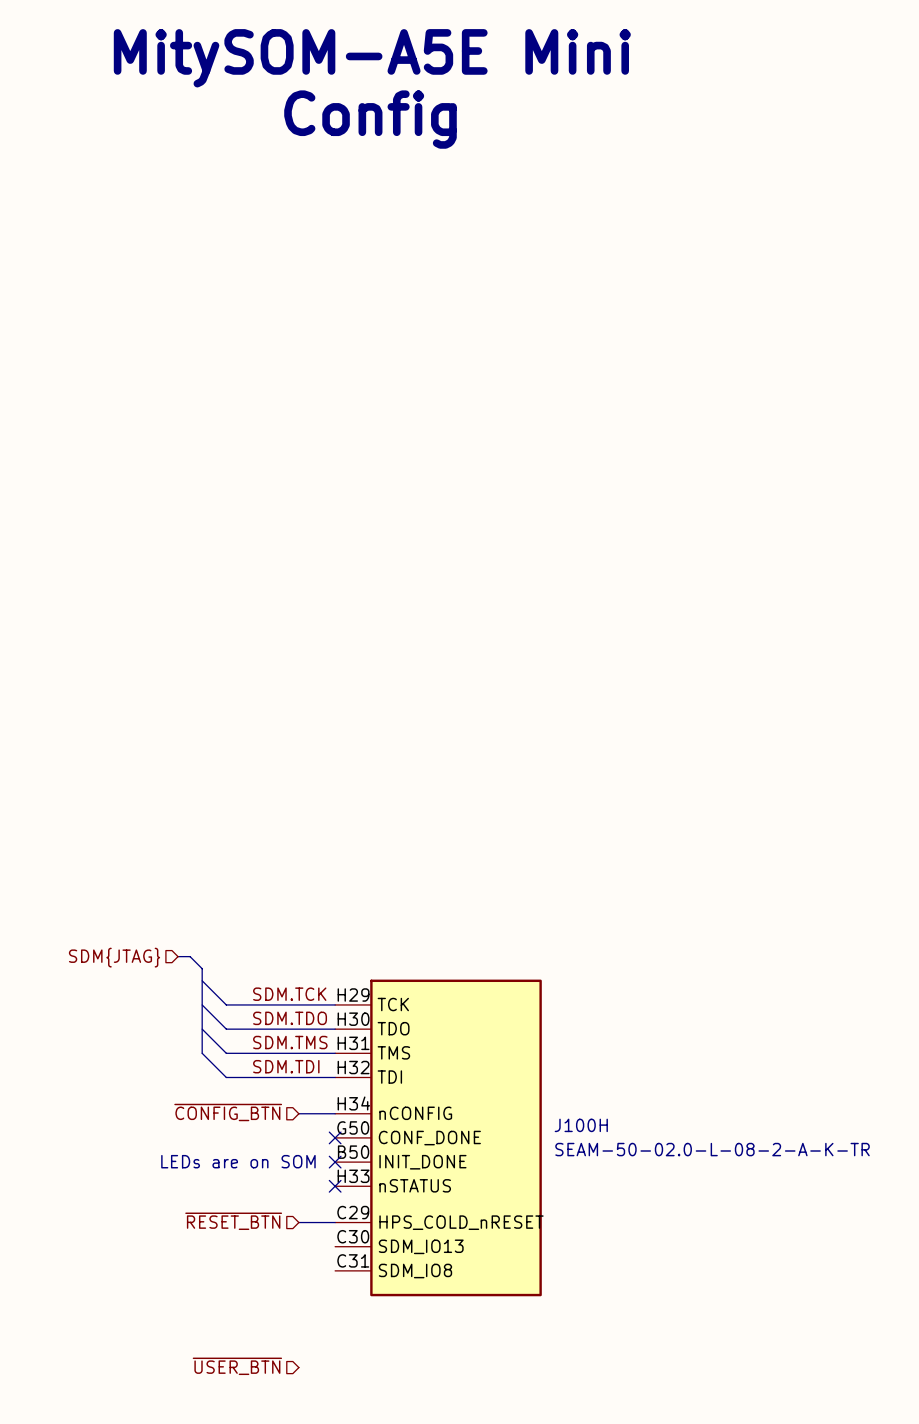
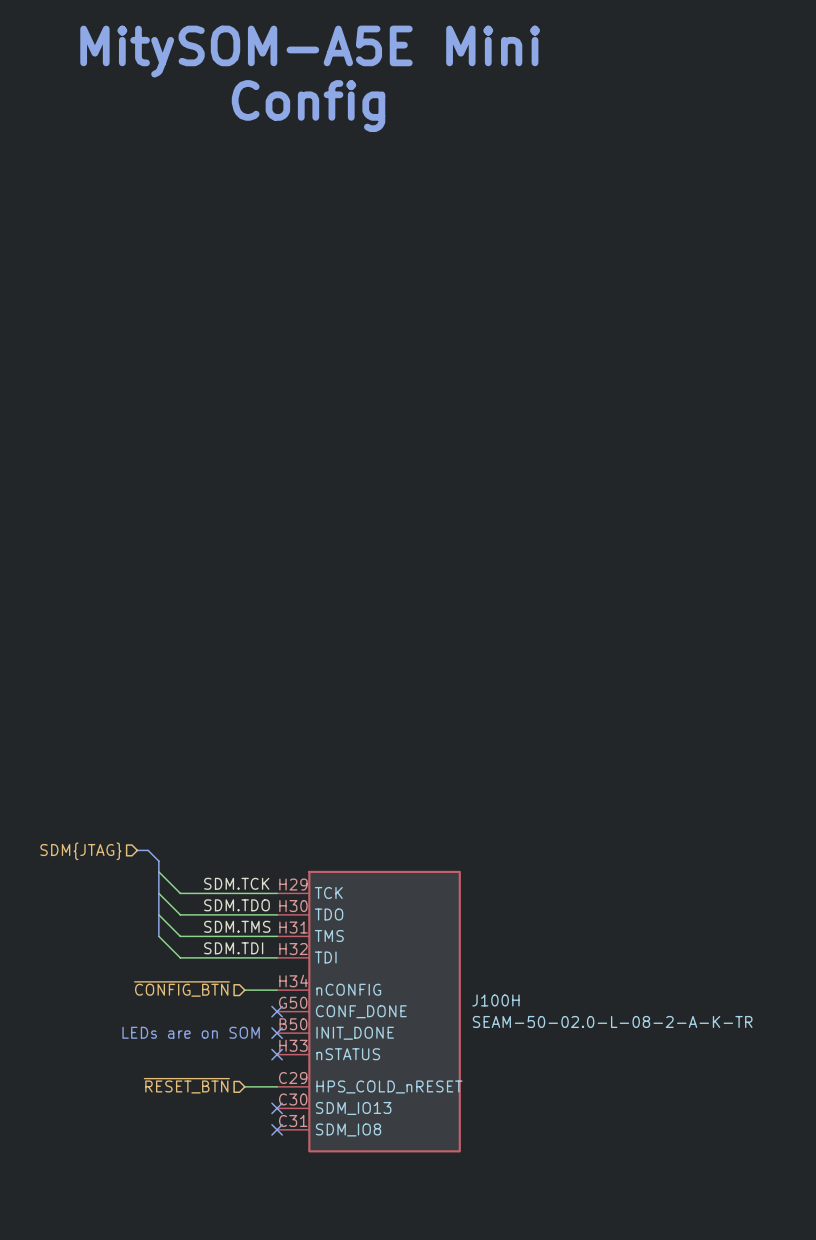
no-connect mark: none -> (277, 1108)
no-connect mark: none -> (277, 1129)
hierarchical label: ~{USER_BTN} (237, 1366) -> none

